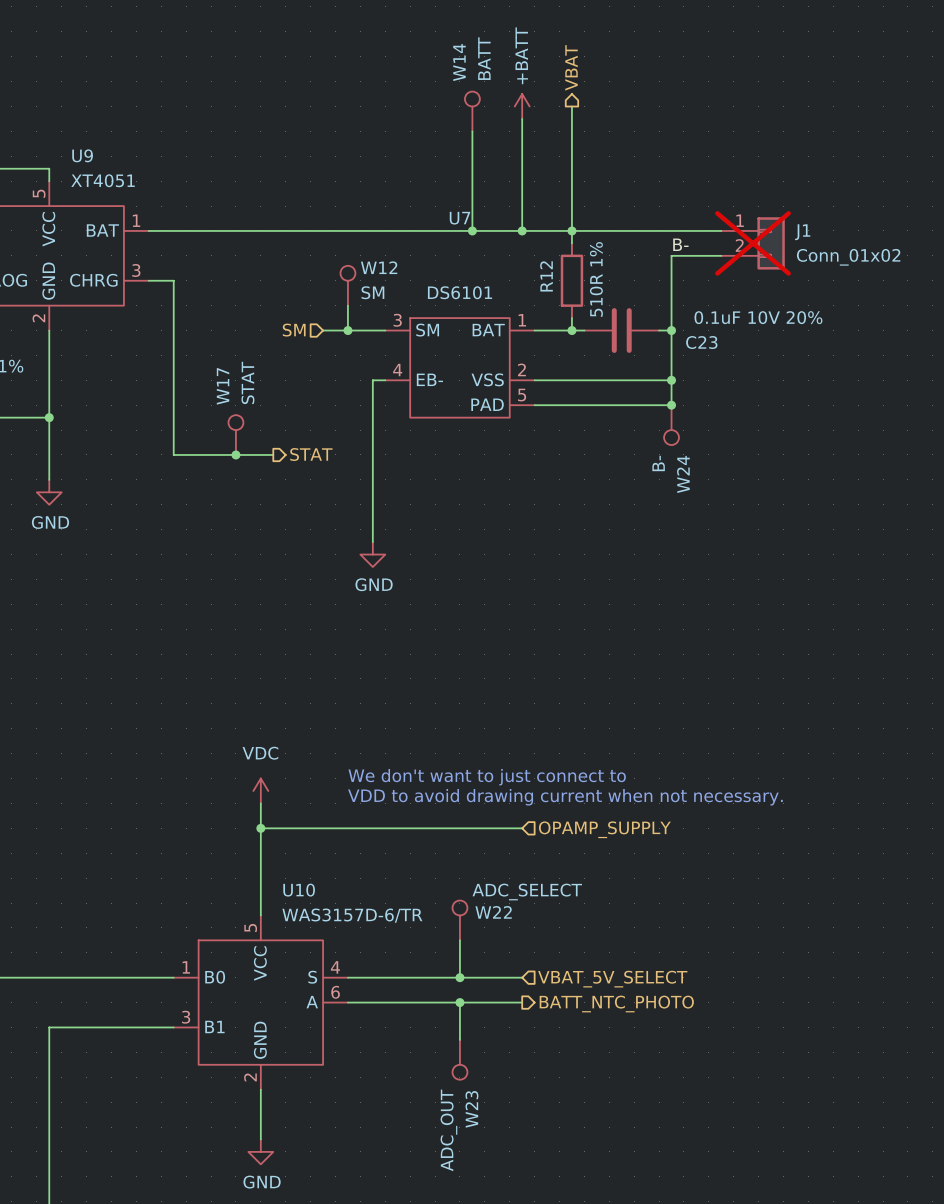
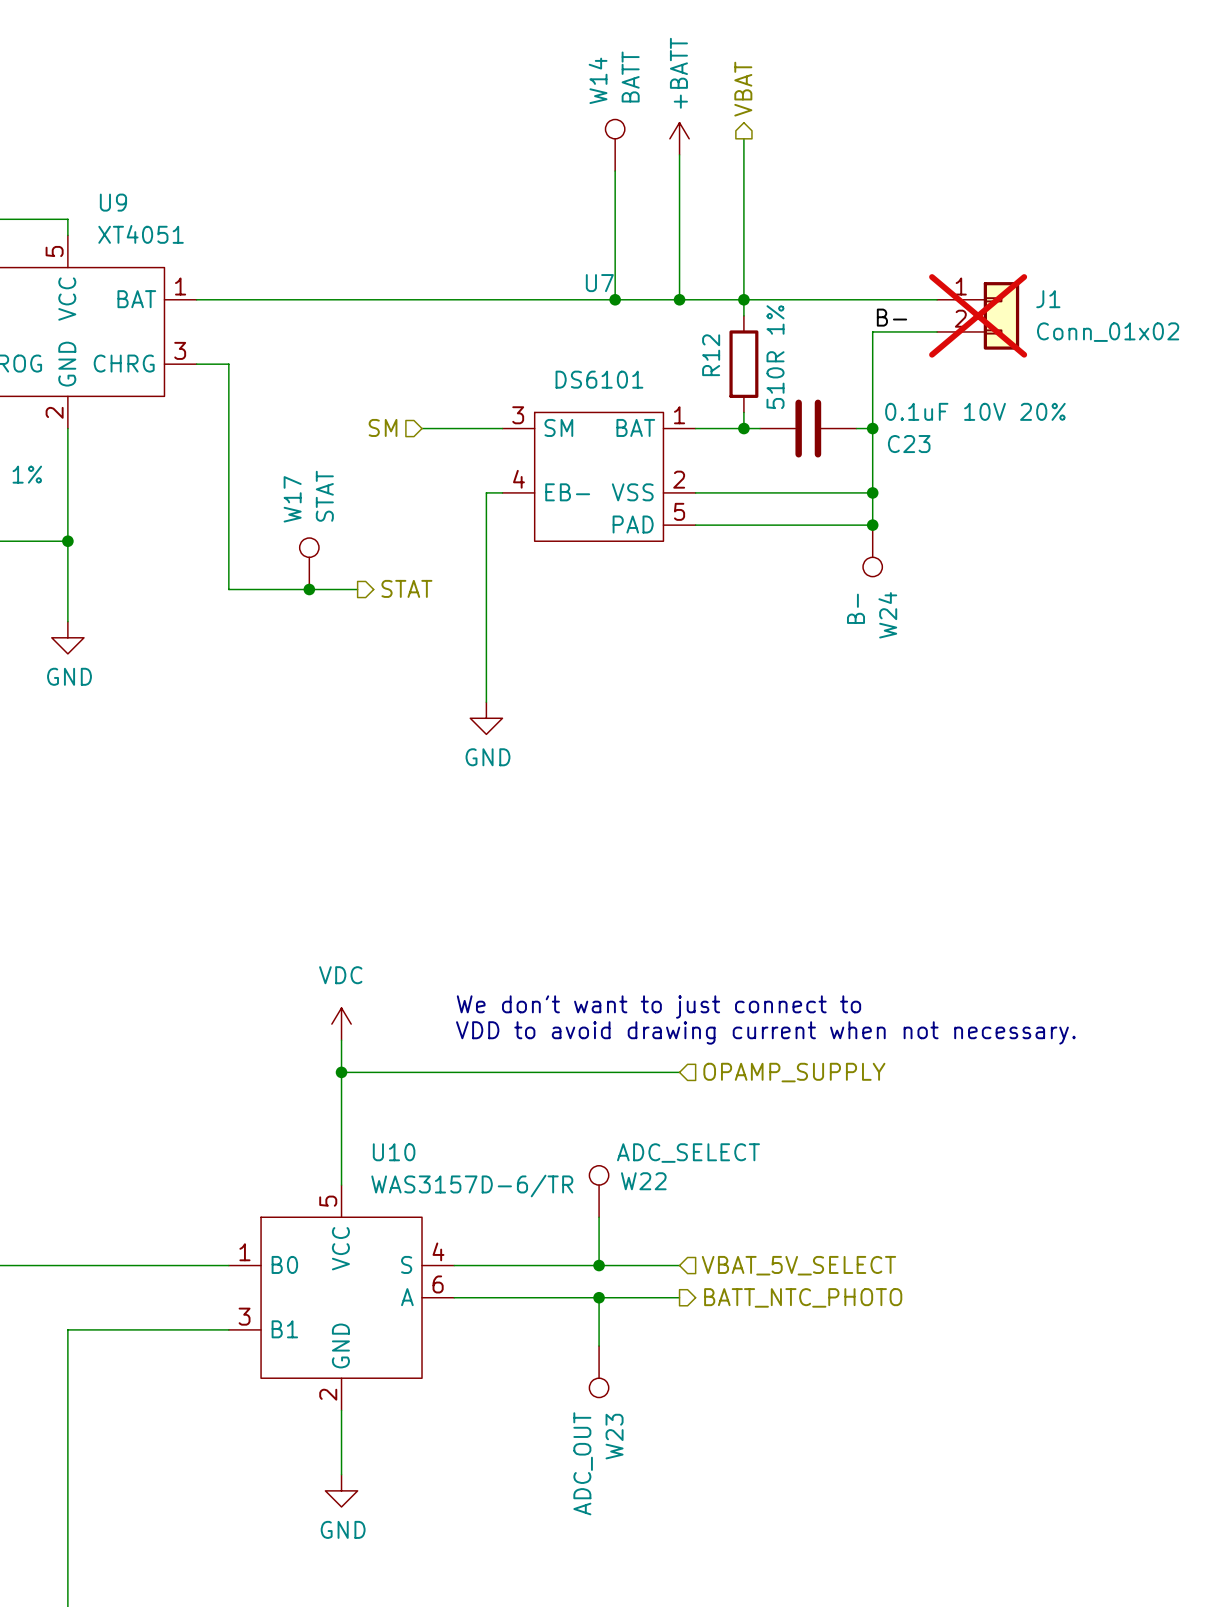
W12: SM (347, 285) -> none
wire: (347, 305) (347, 330) -> none
junction: (347, 330) -> none

